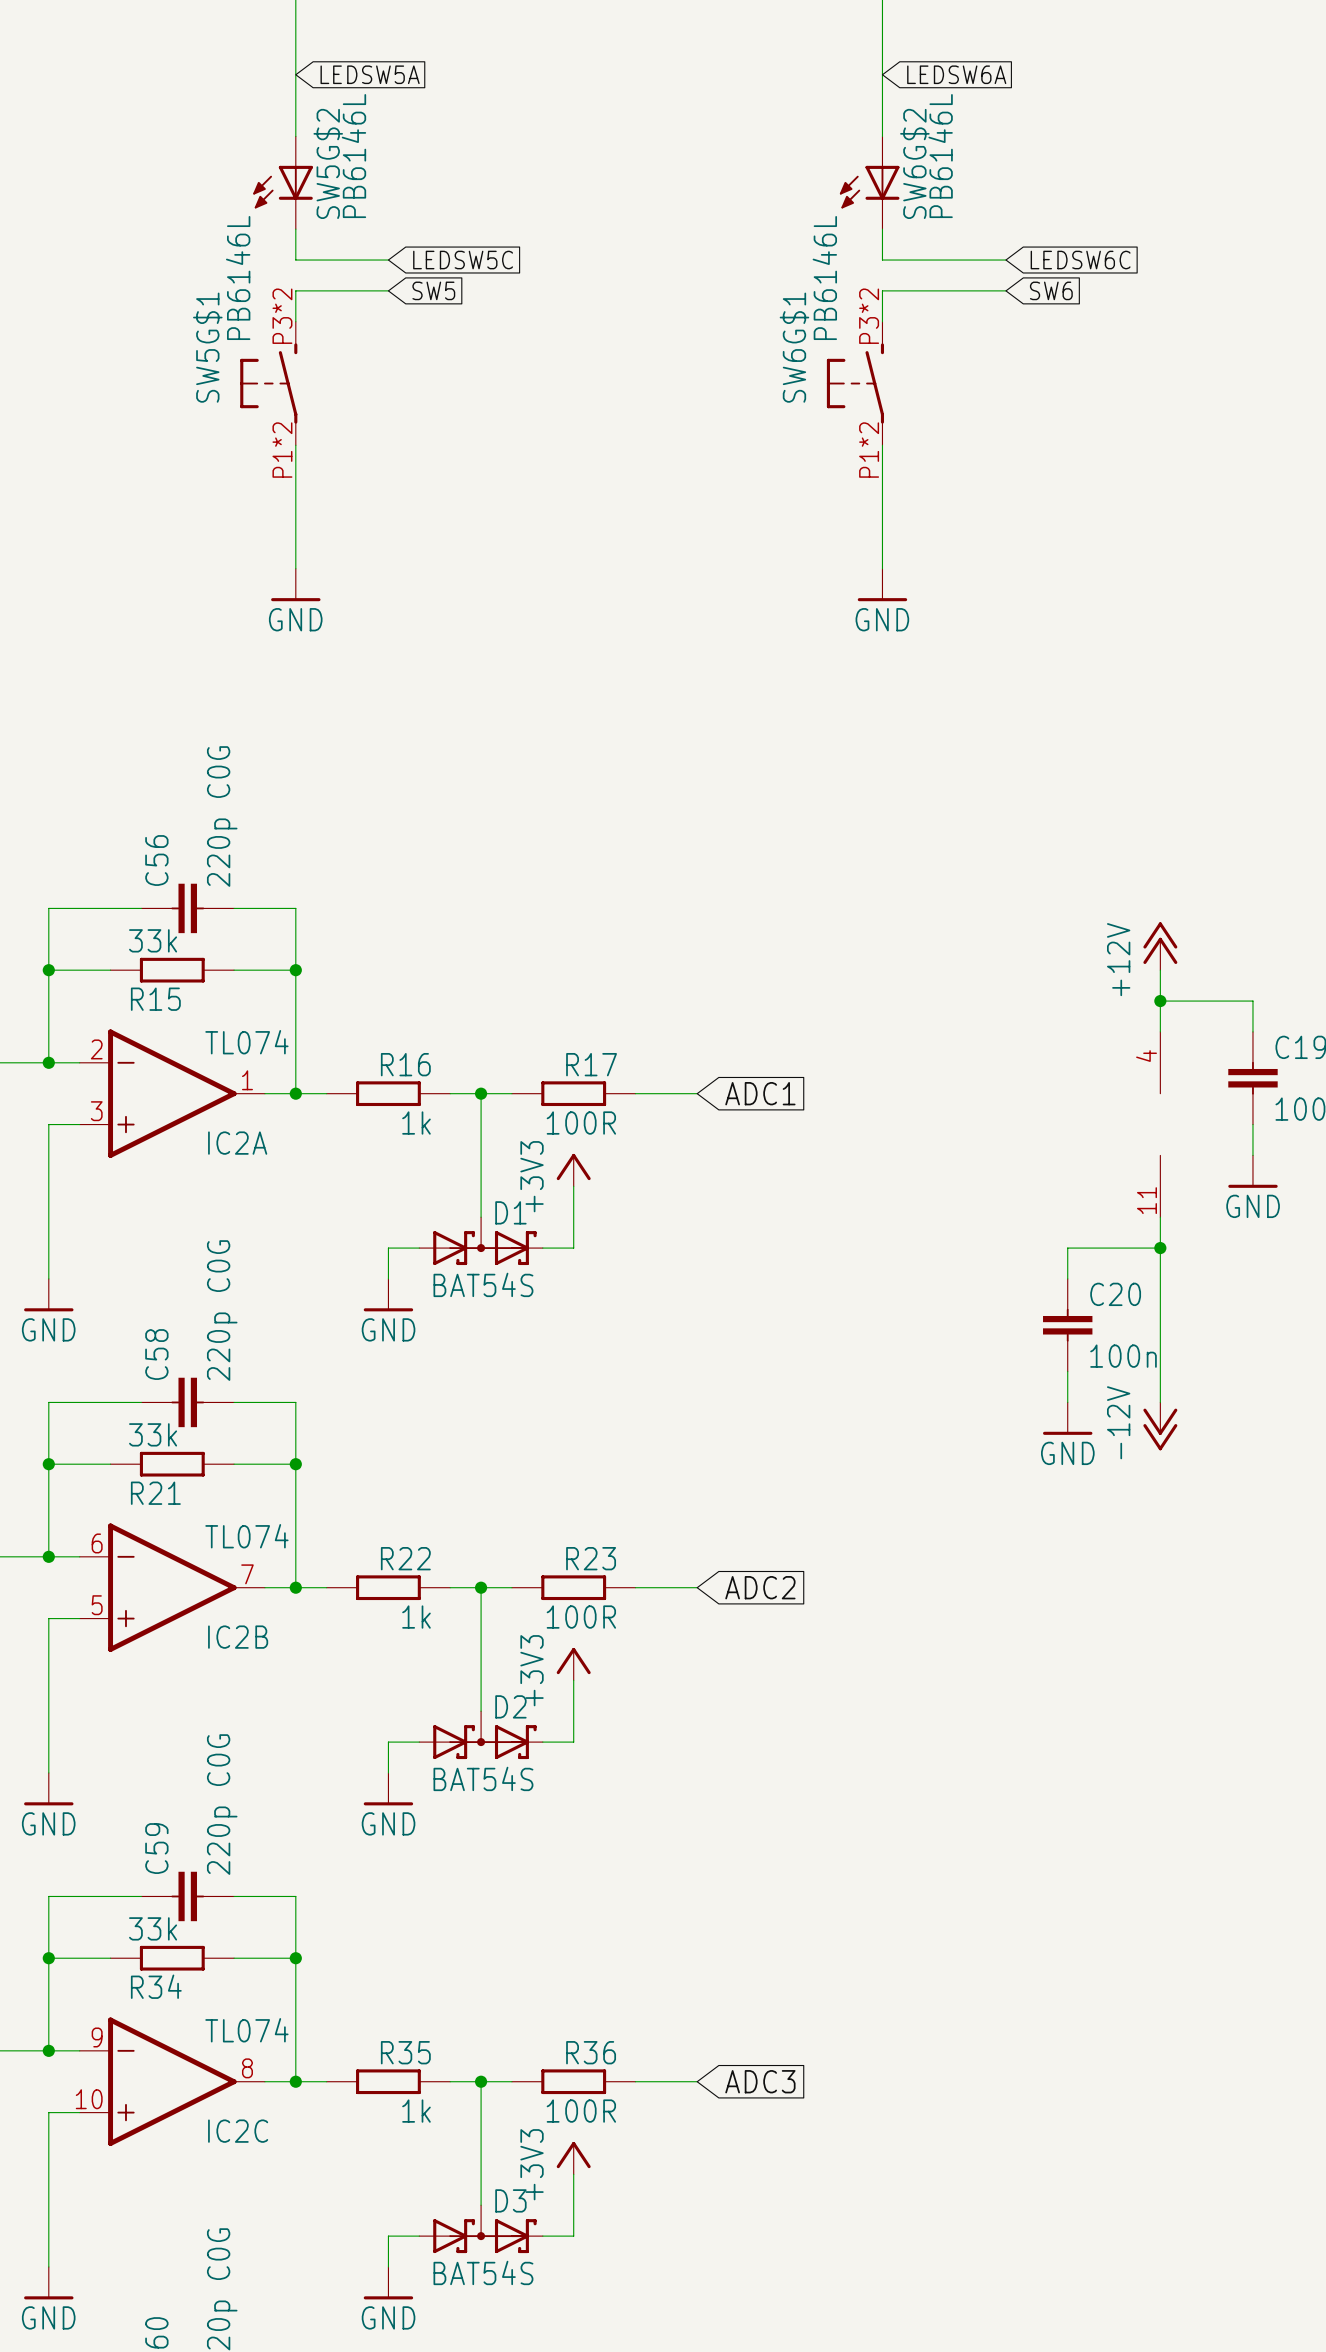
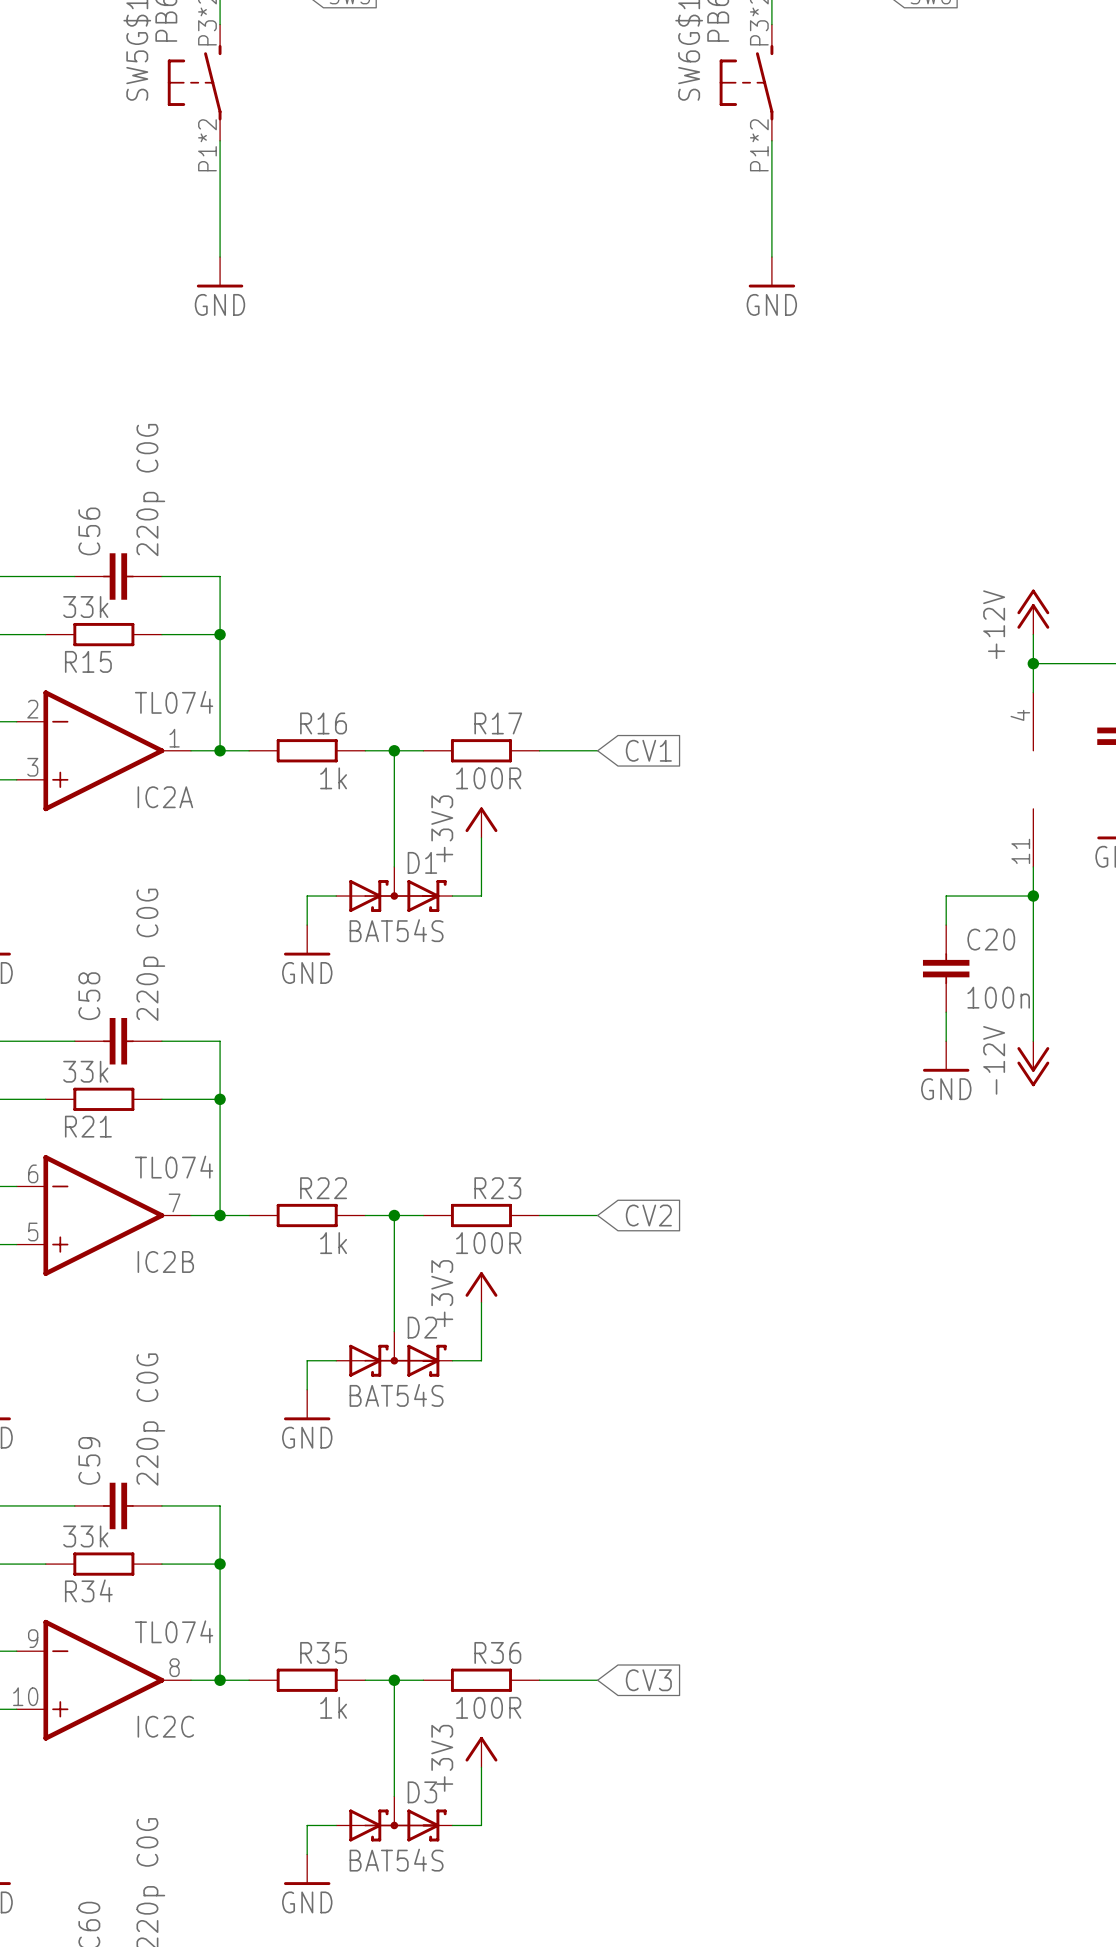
global label: ADC1 (760, 1093) -> CV1 (648, 750)
global label: ADC2 (760, 1587) -> CV2 (648, 1215)
global label: ADC3 (760, 2081) -> CV3 (648, 1680)

